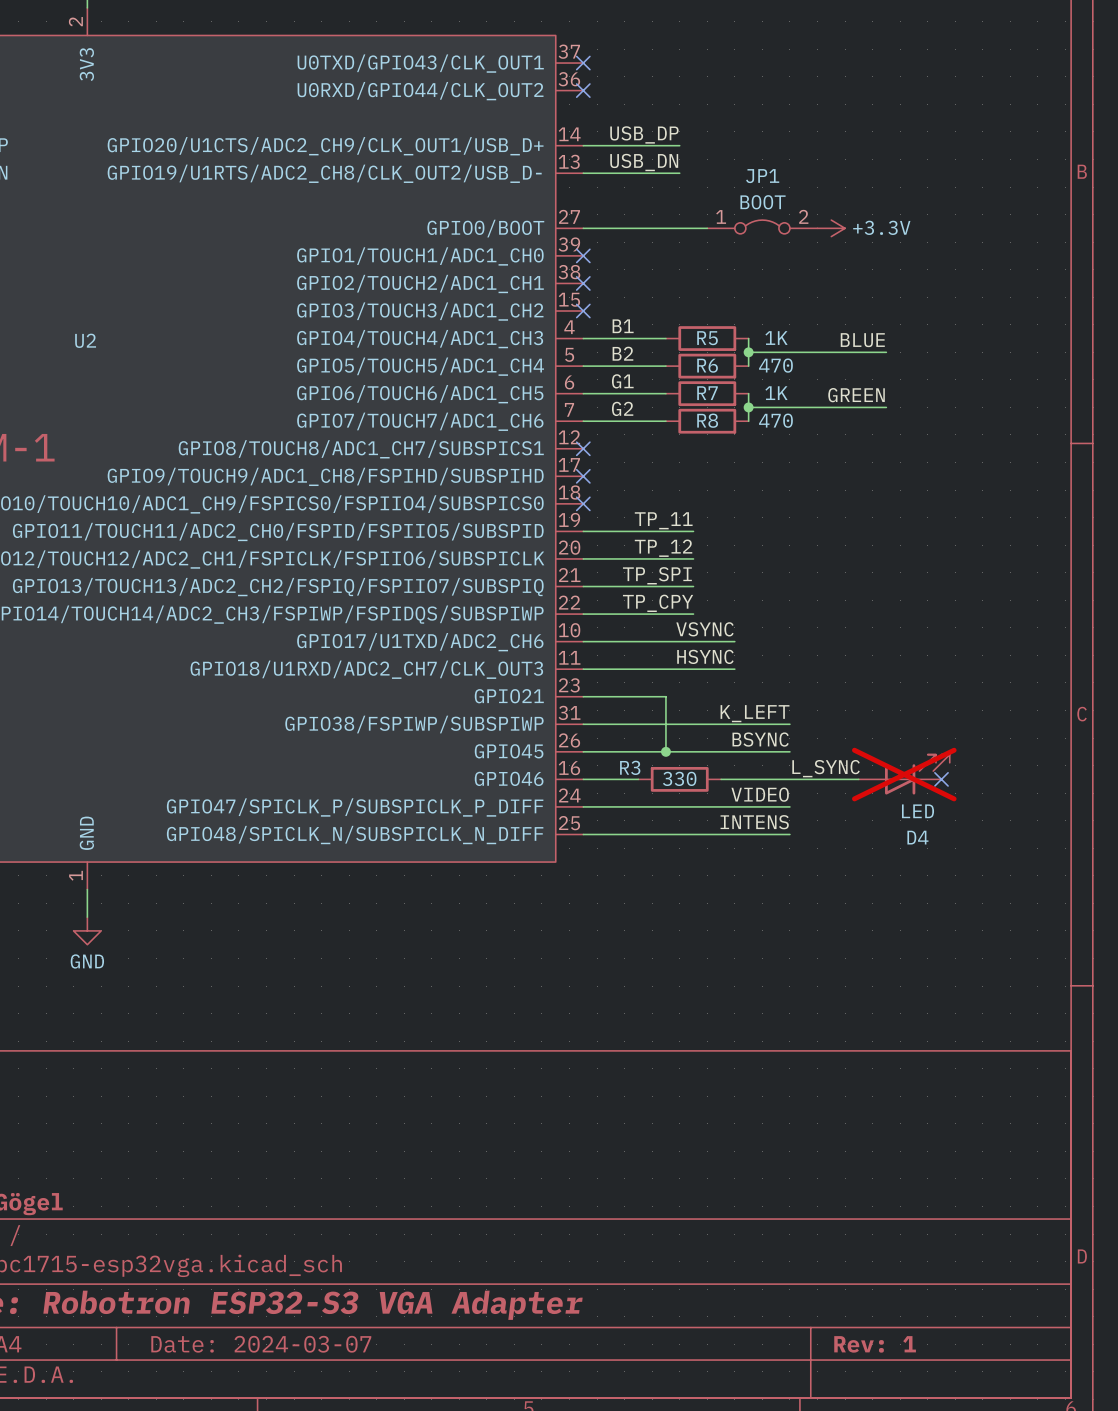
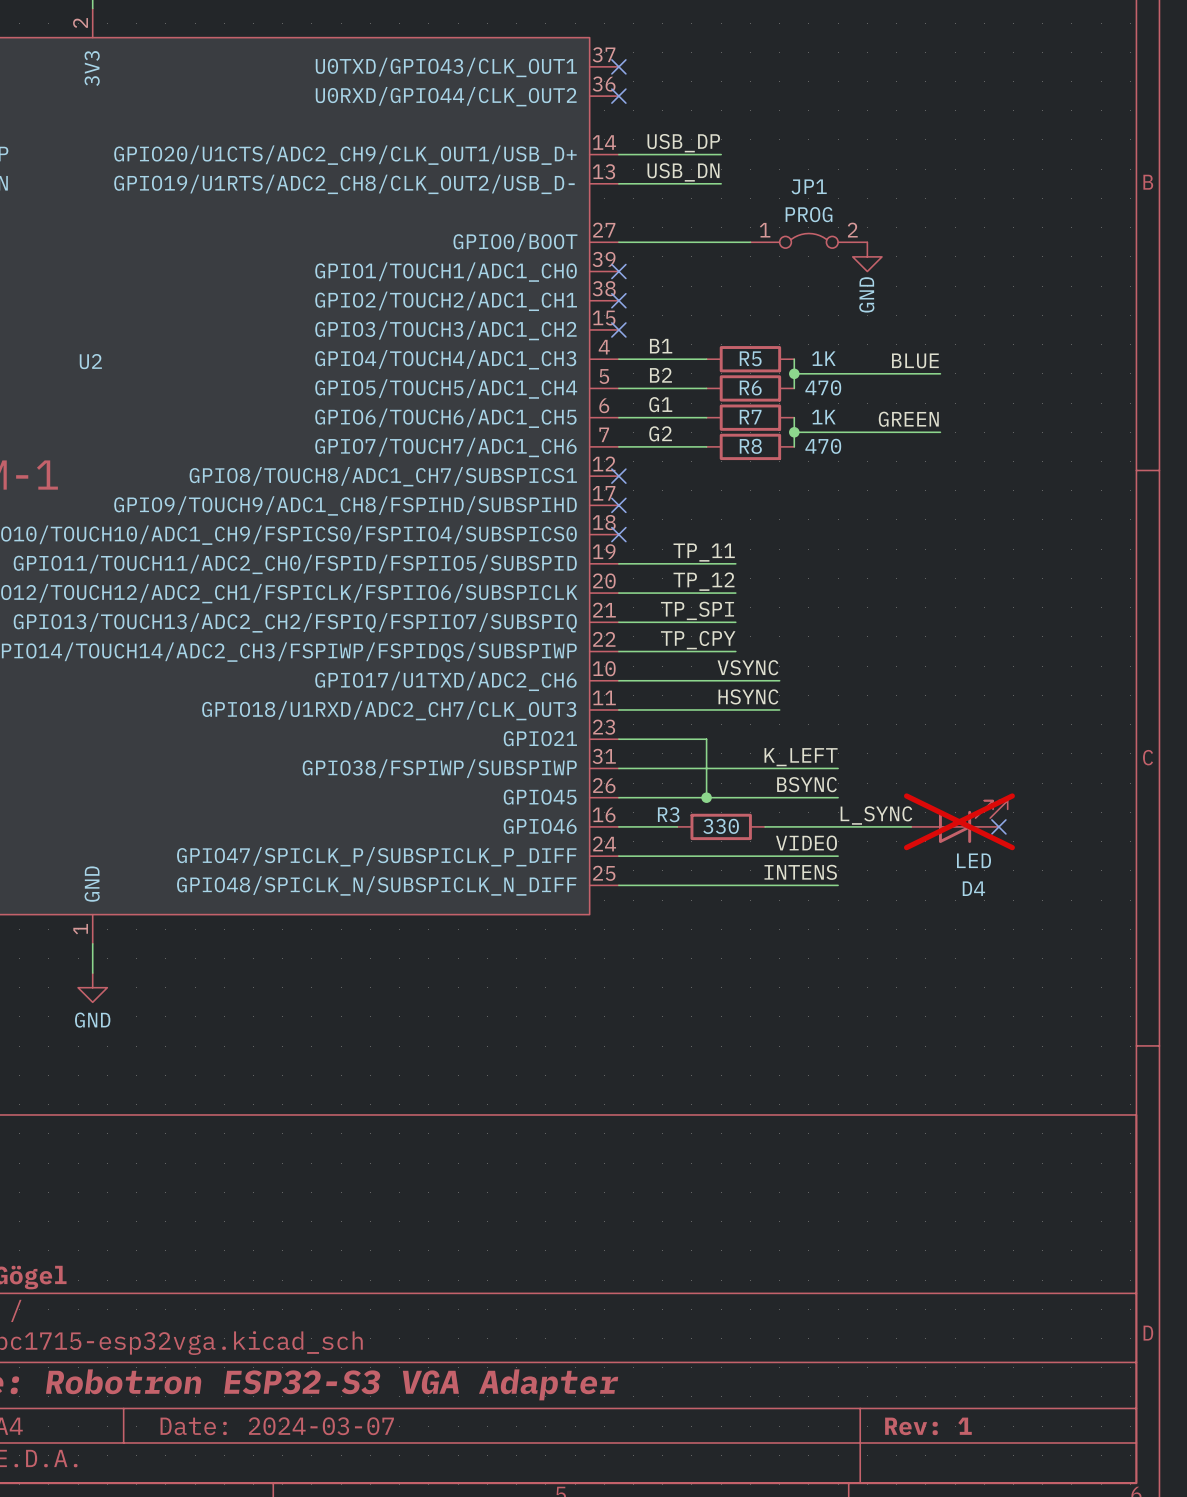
JP1 value: BOOT (763, 202) -> PROG (809, 214)
power symbol: +3.3V (831, 228) -> none
power symbol: none -> GND (867, 256)

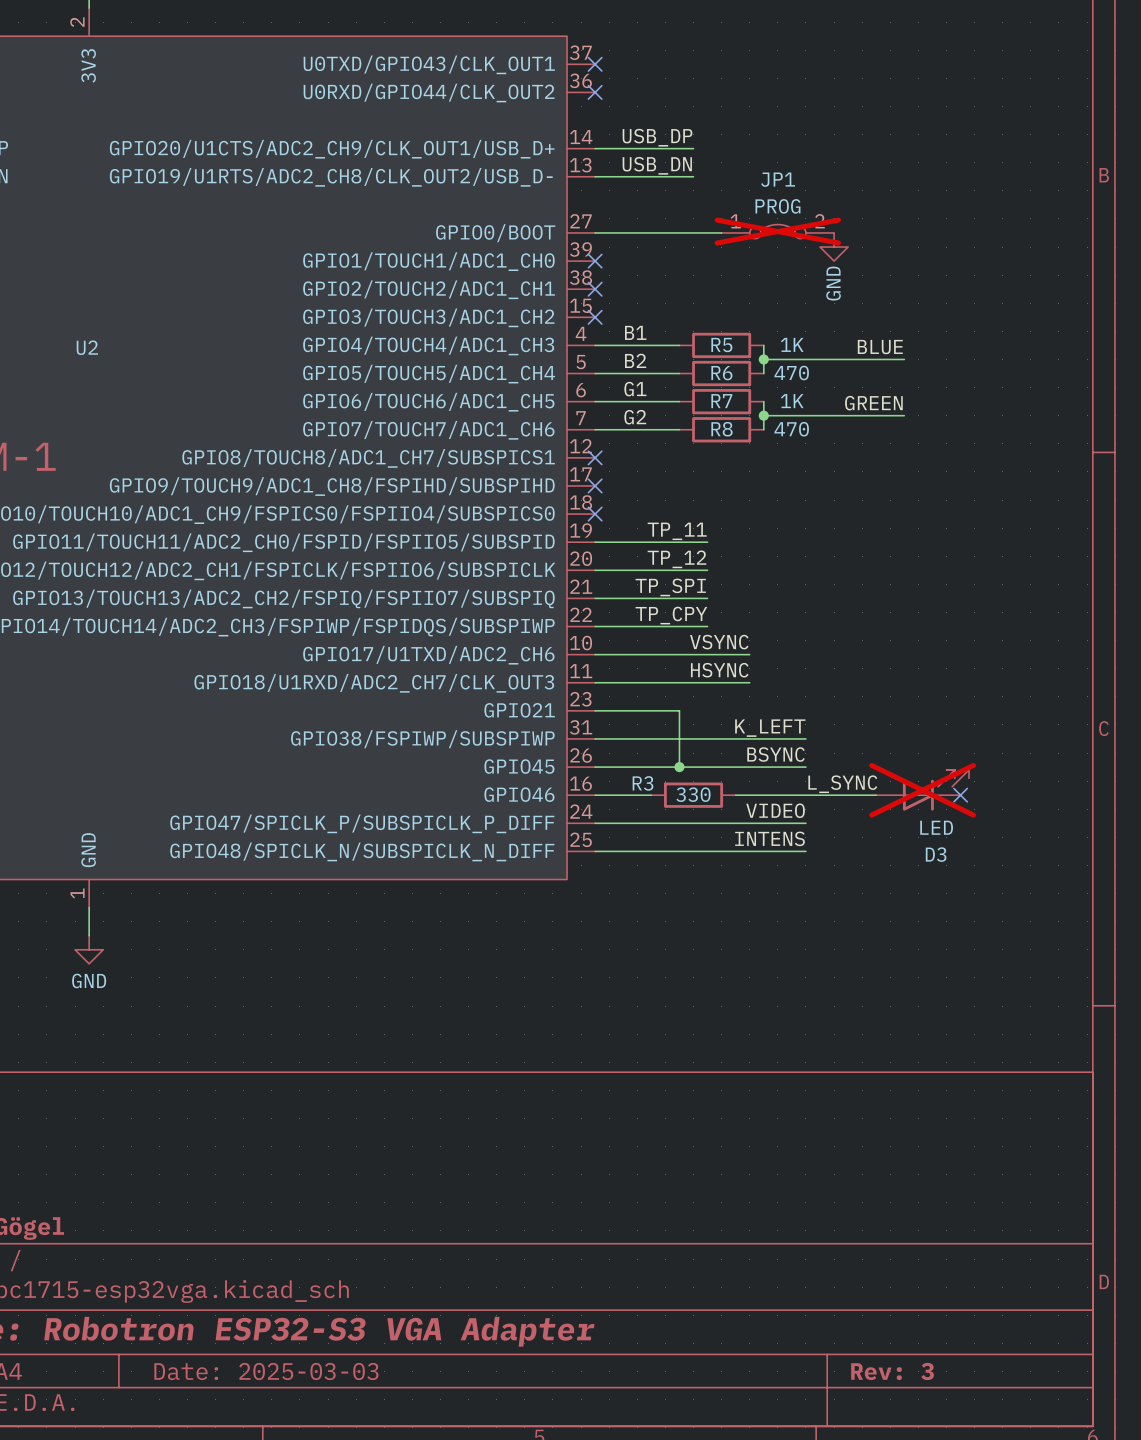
JP1 do-not-place cross: none -> (777, 231)
D4 name: D4 (973, 888) -> D3 (936, 854)
title block: Date: 2024-03-07 (277, 1426) -> Date: 2025-03-03 (266, 1371)
title block: Rev: 1 (928, 1426) -> Rev: 3 (892, 1371)

